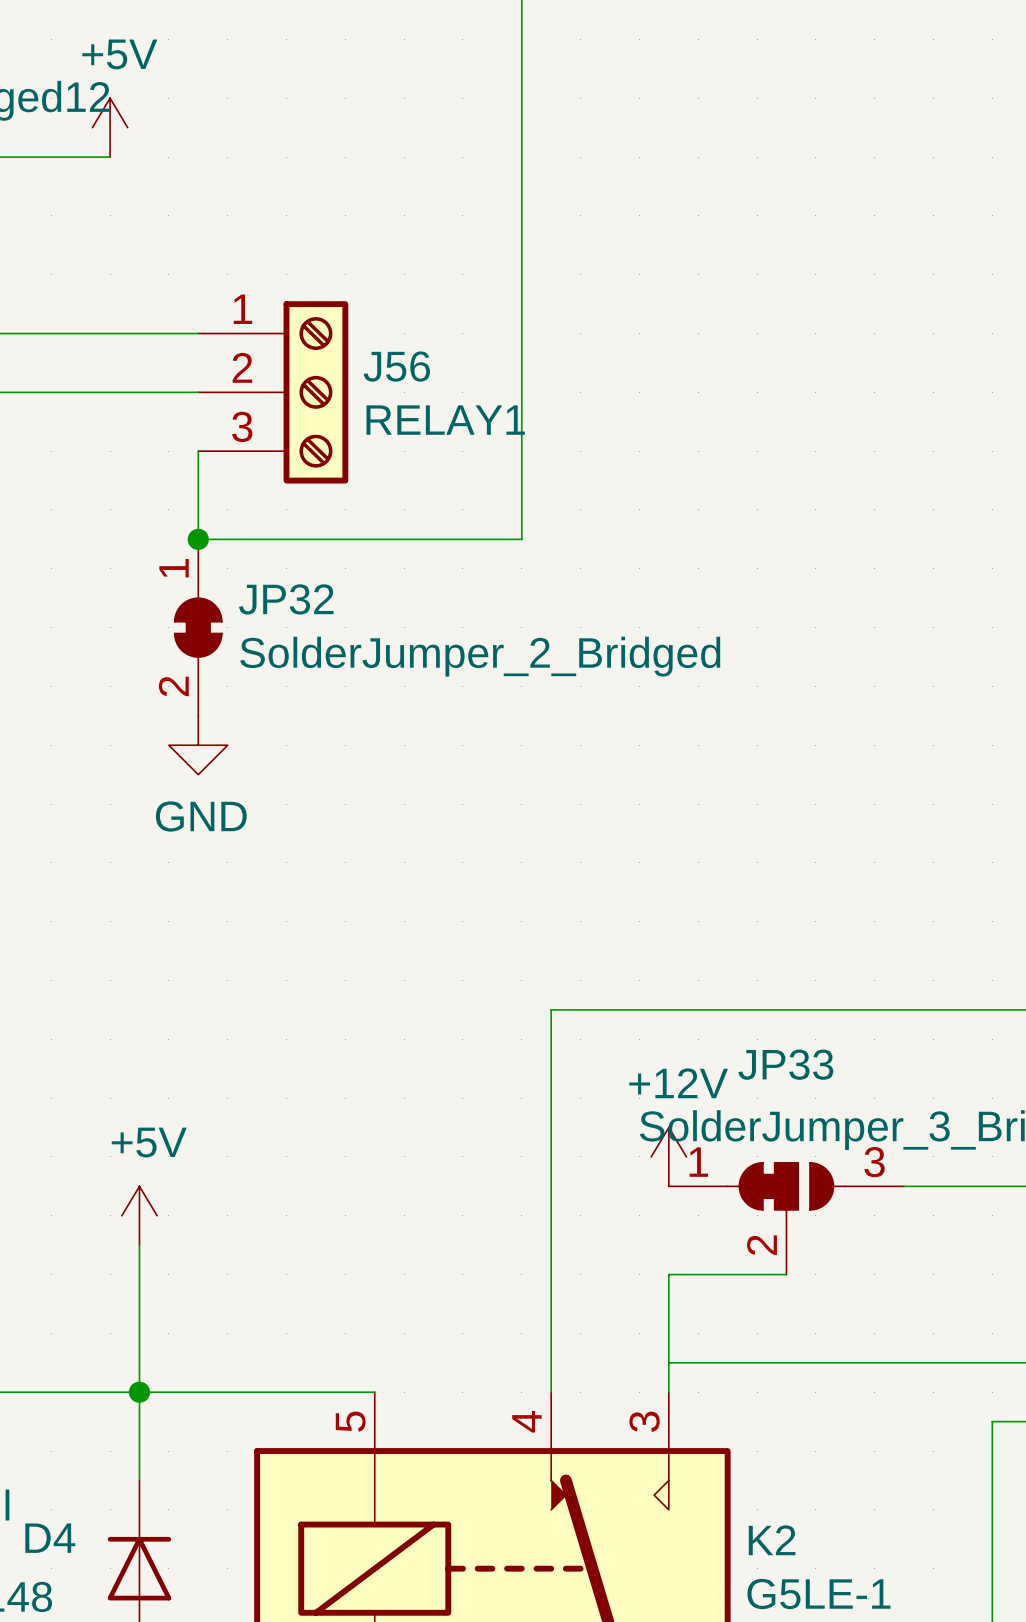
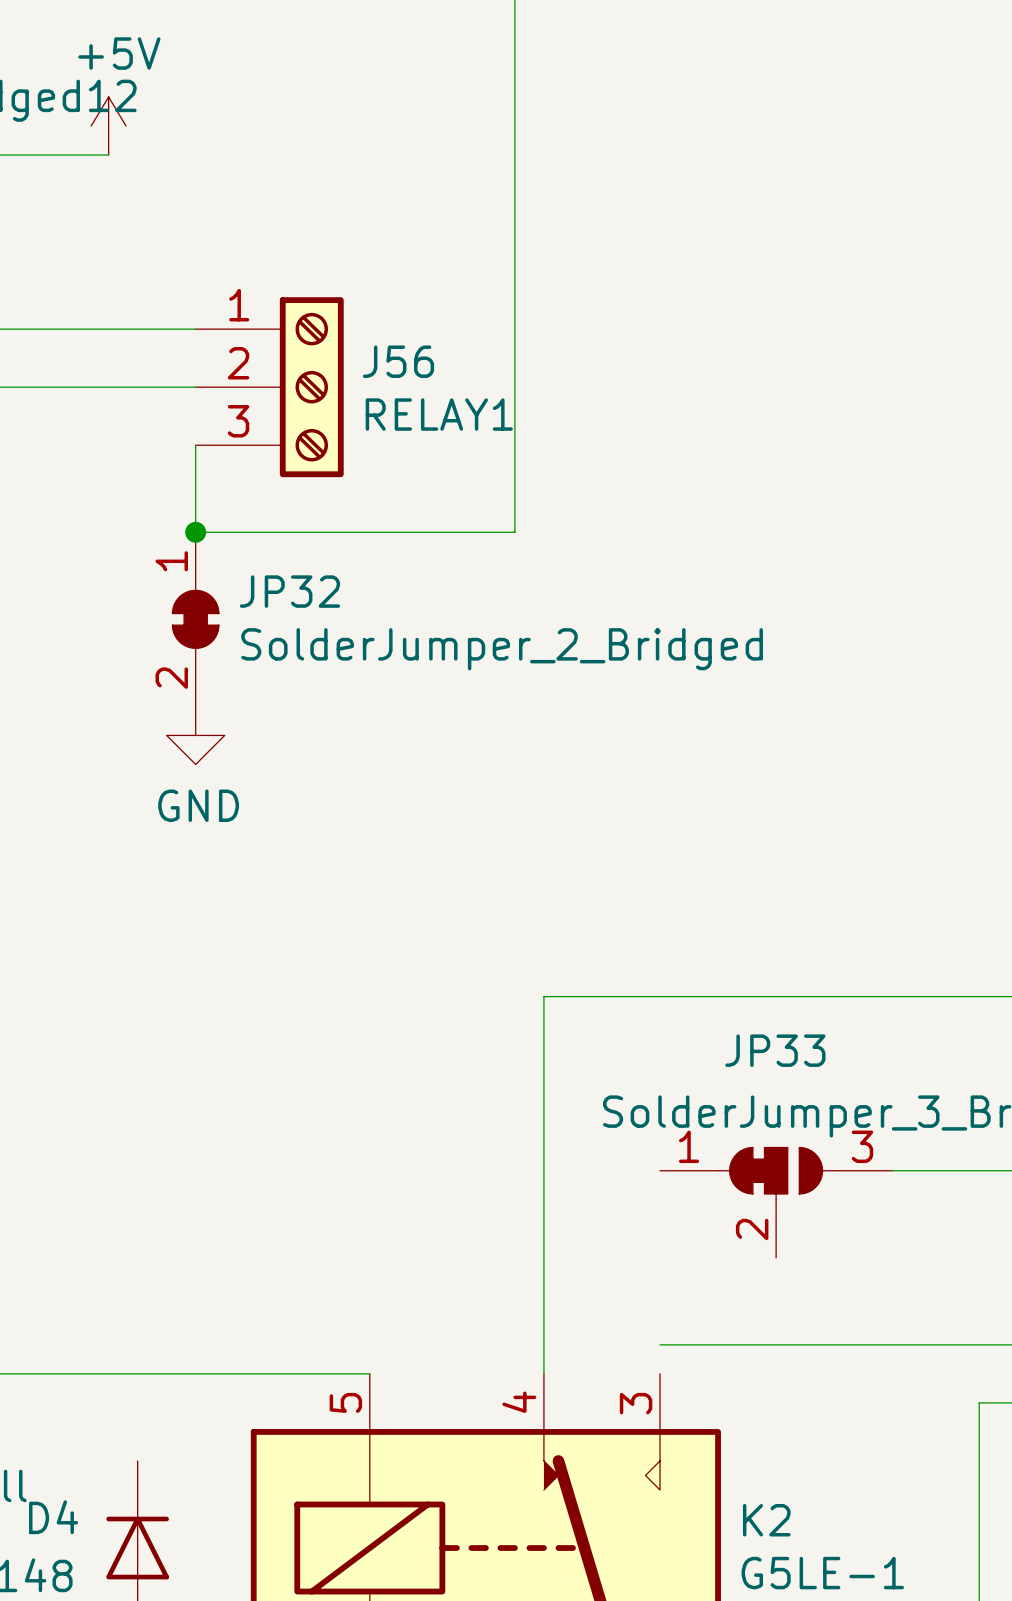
power symbol: +12V (668, 1156) -> none
power symbol: +5V (139, 1215) -> none
wire: (139, 1245) (139, 1480) -> none
wire: (786, 1274) (668, 1274) (668, 1392) -> none
junction: (139, 1392) -> none

